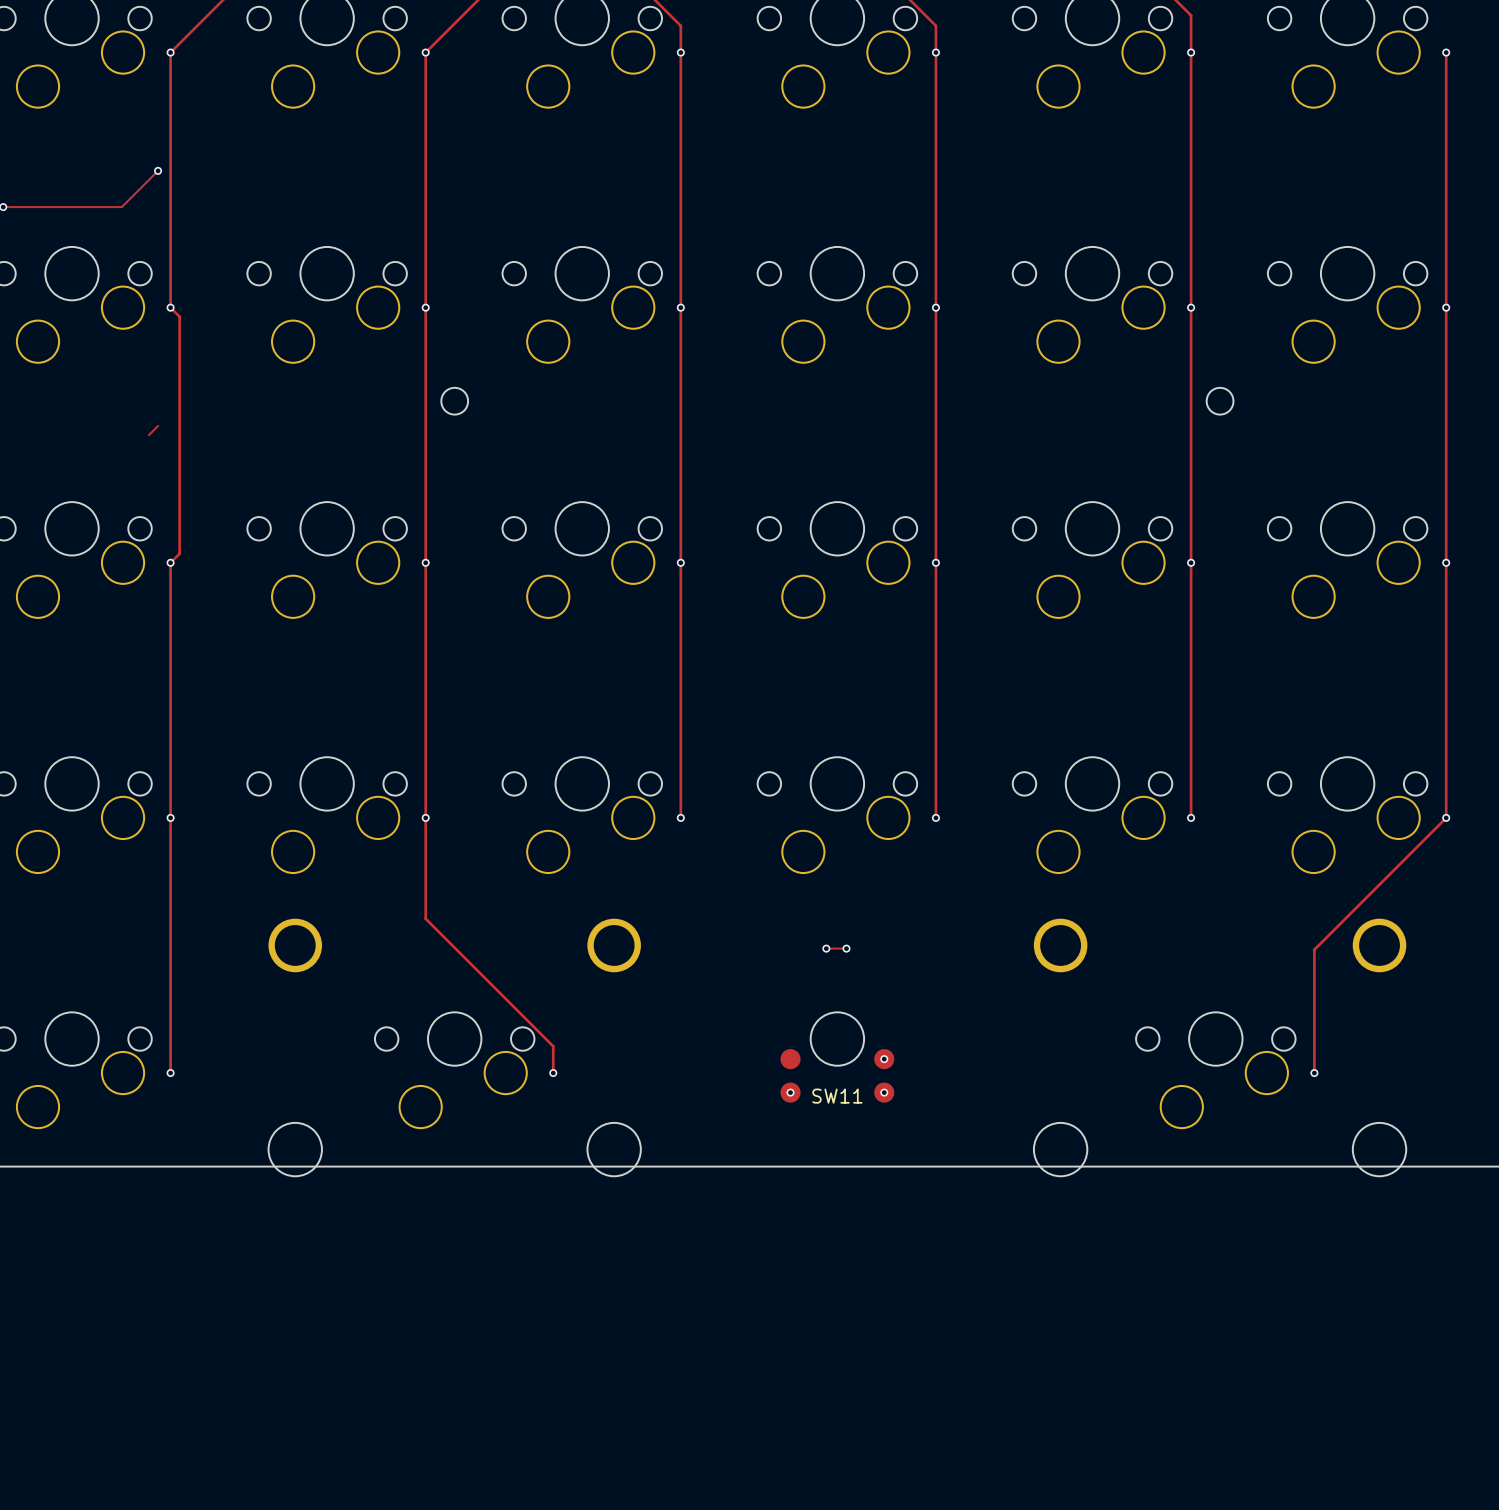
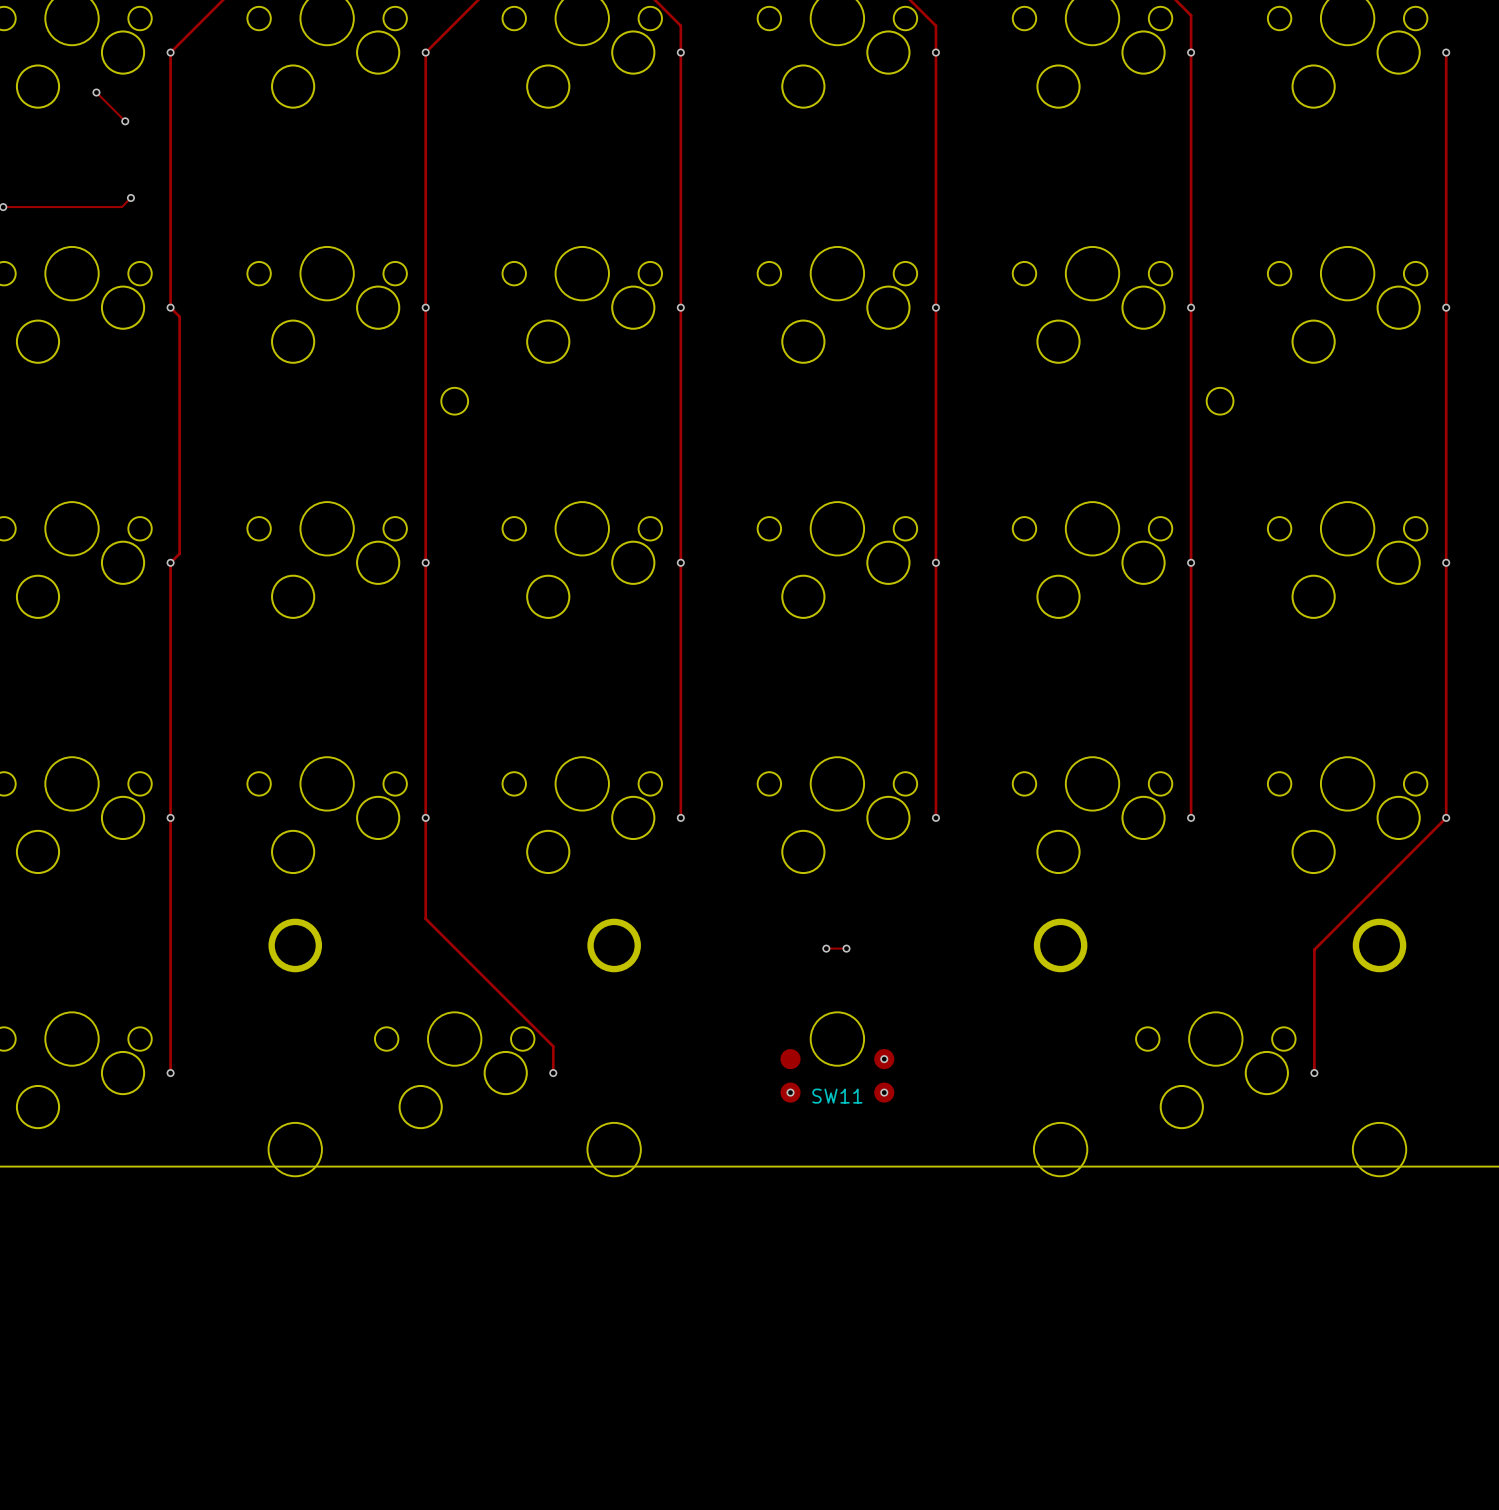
track: none -> (96, 92) (125, 121)
via: none -> (96, 92)
via: none -> (125, 121)
track: (158, 170) (130, 197) -> none
via: (158, 170) -> none
via: none -> (130, 197)
track: (158, 425) (148, 435) -> none

